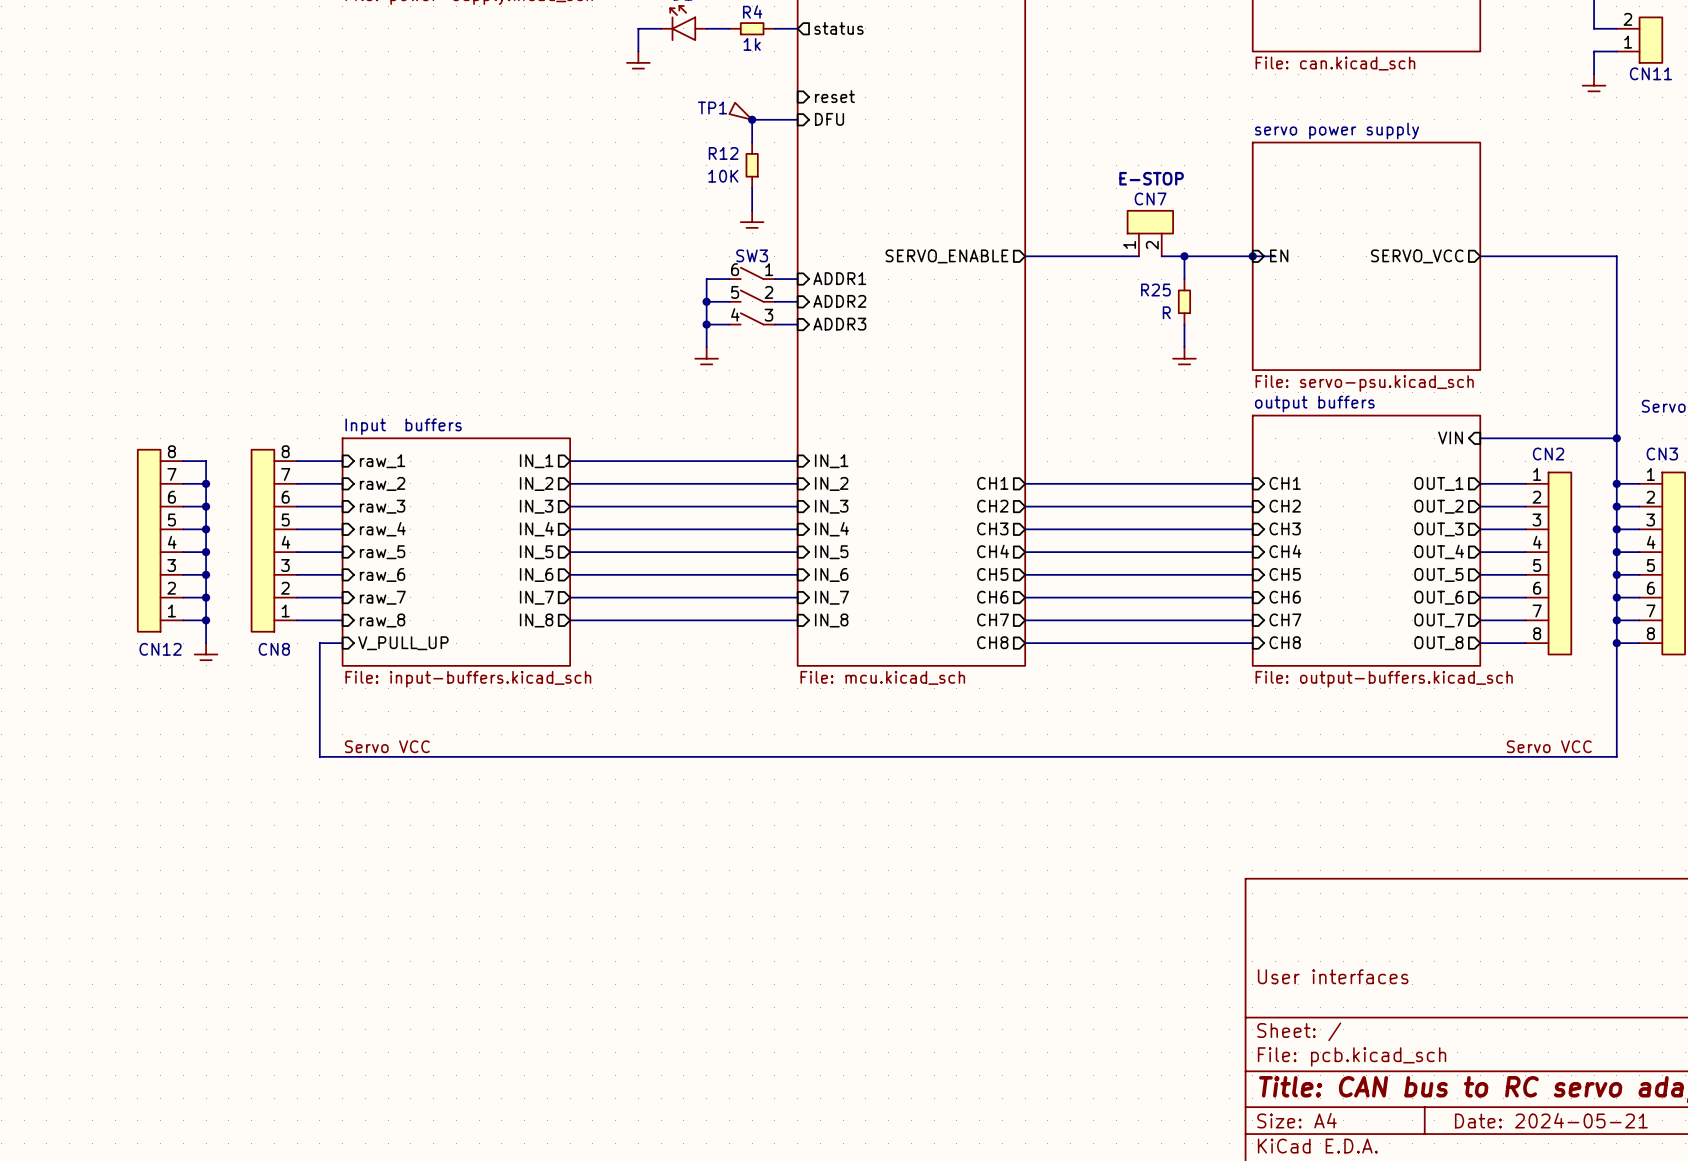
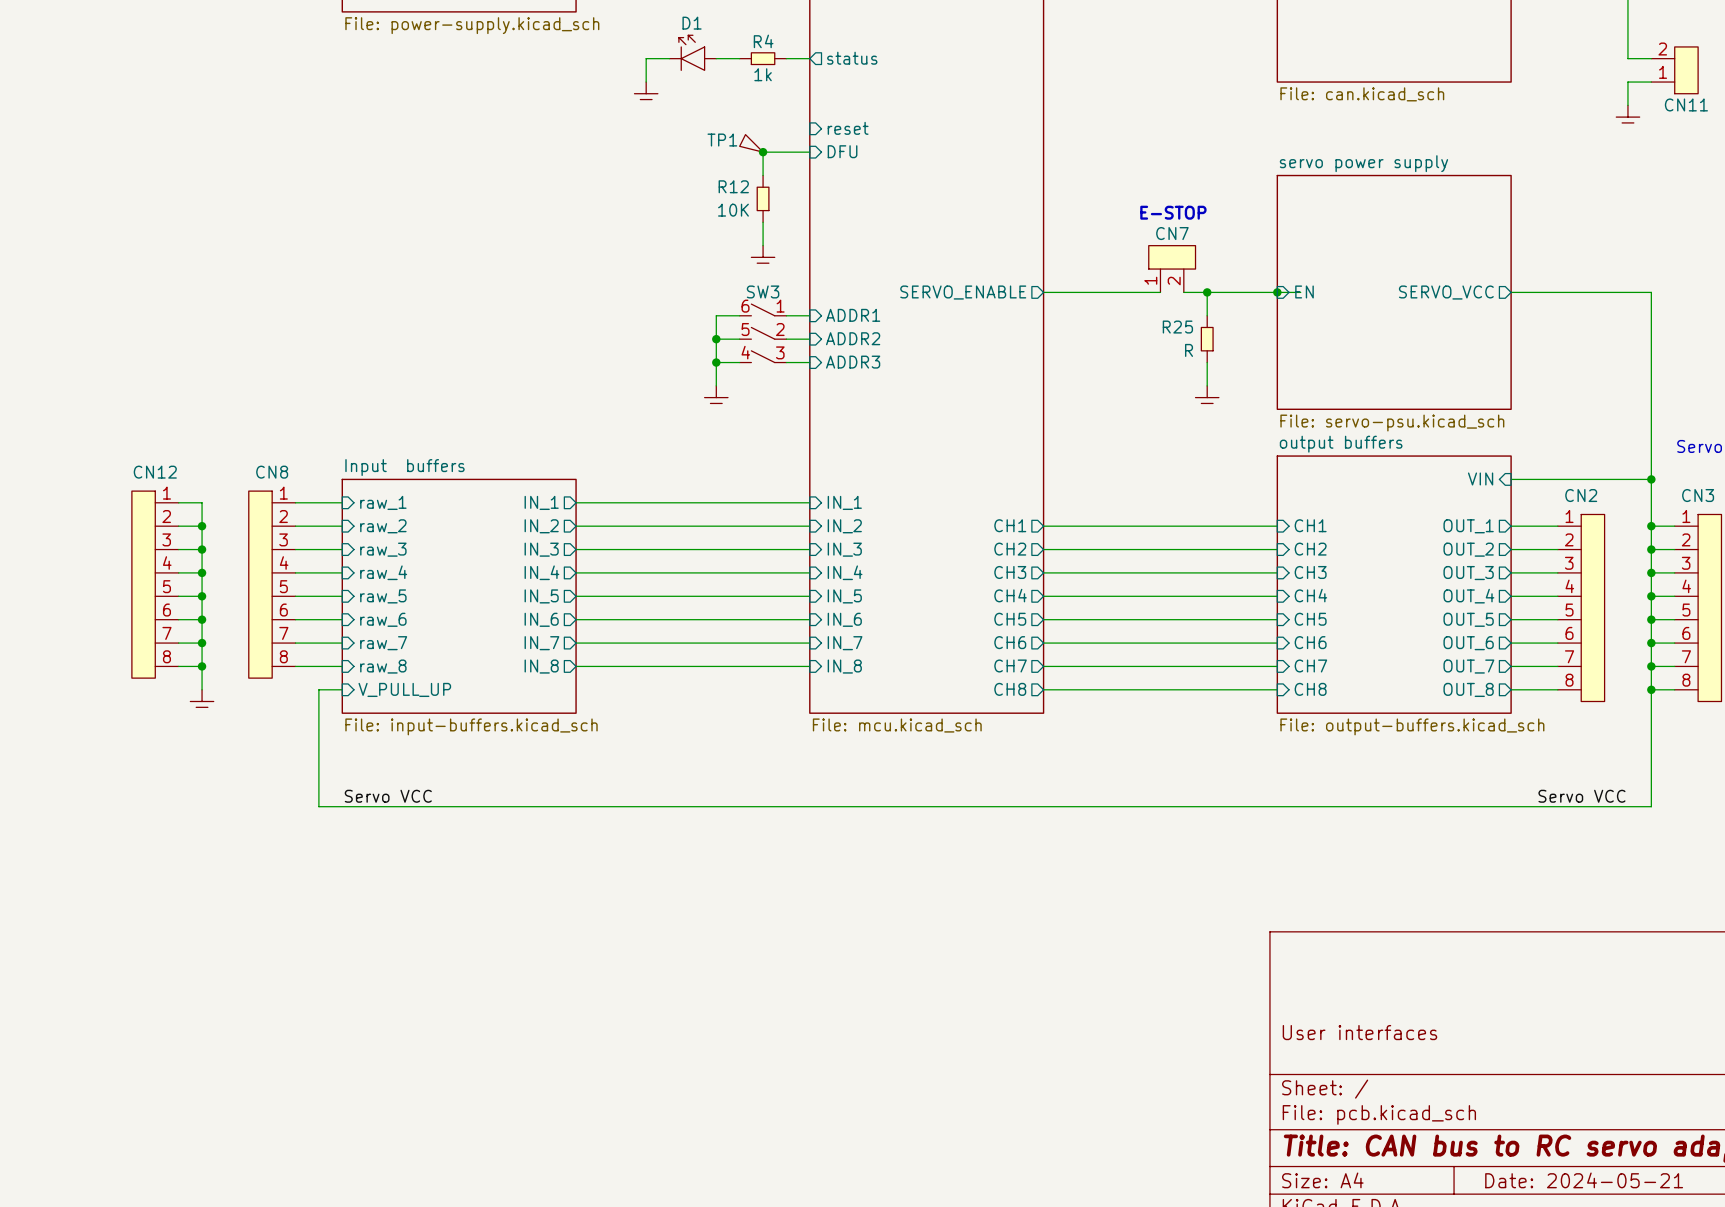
CN12 flip: as is (149, 540) -> up-down (143, 584)
CN8 flip: as is (262, 540) -> up-down (260, 584)

